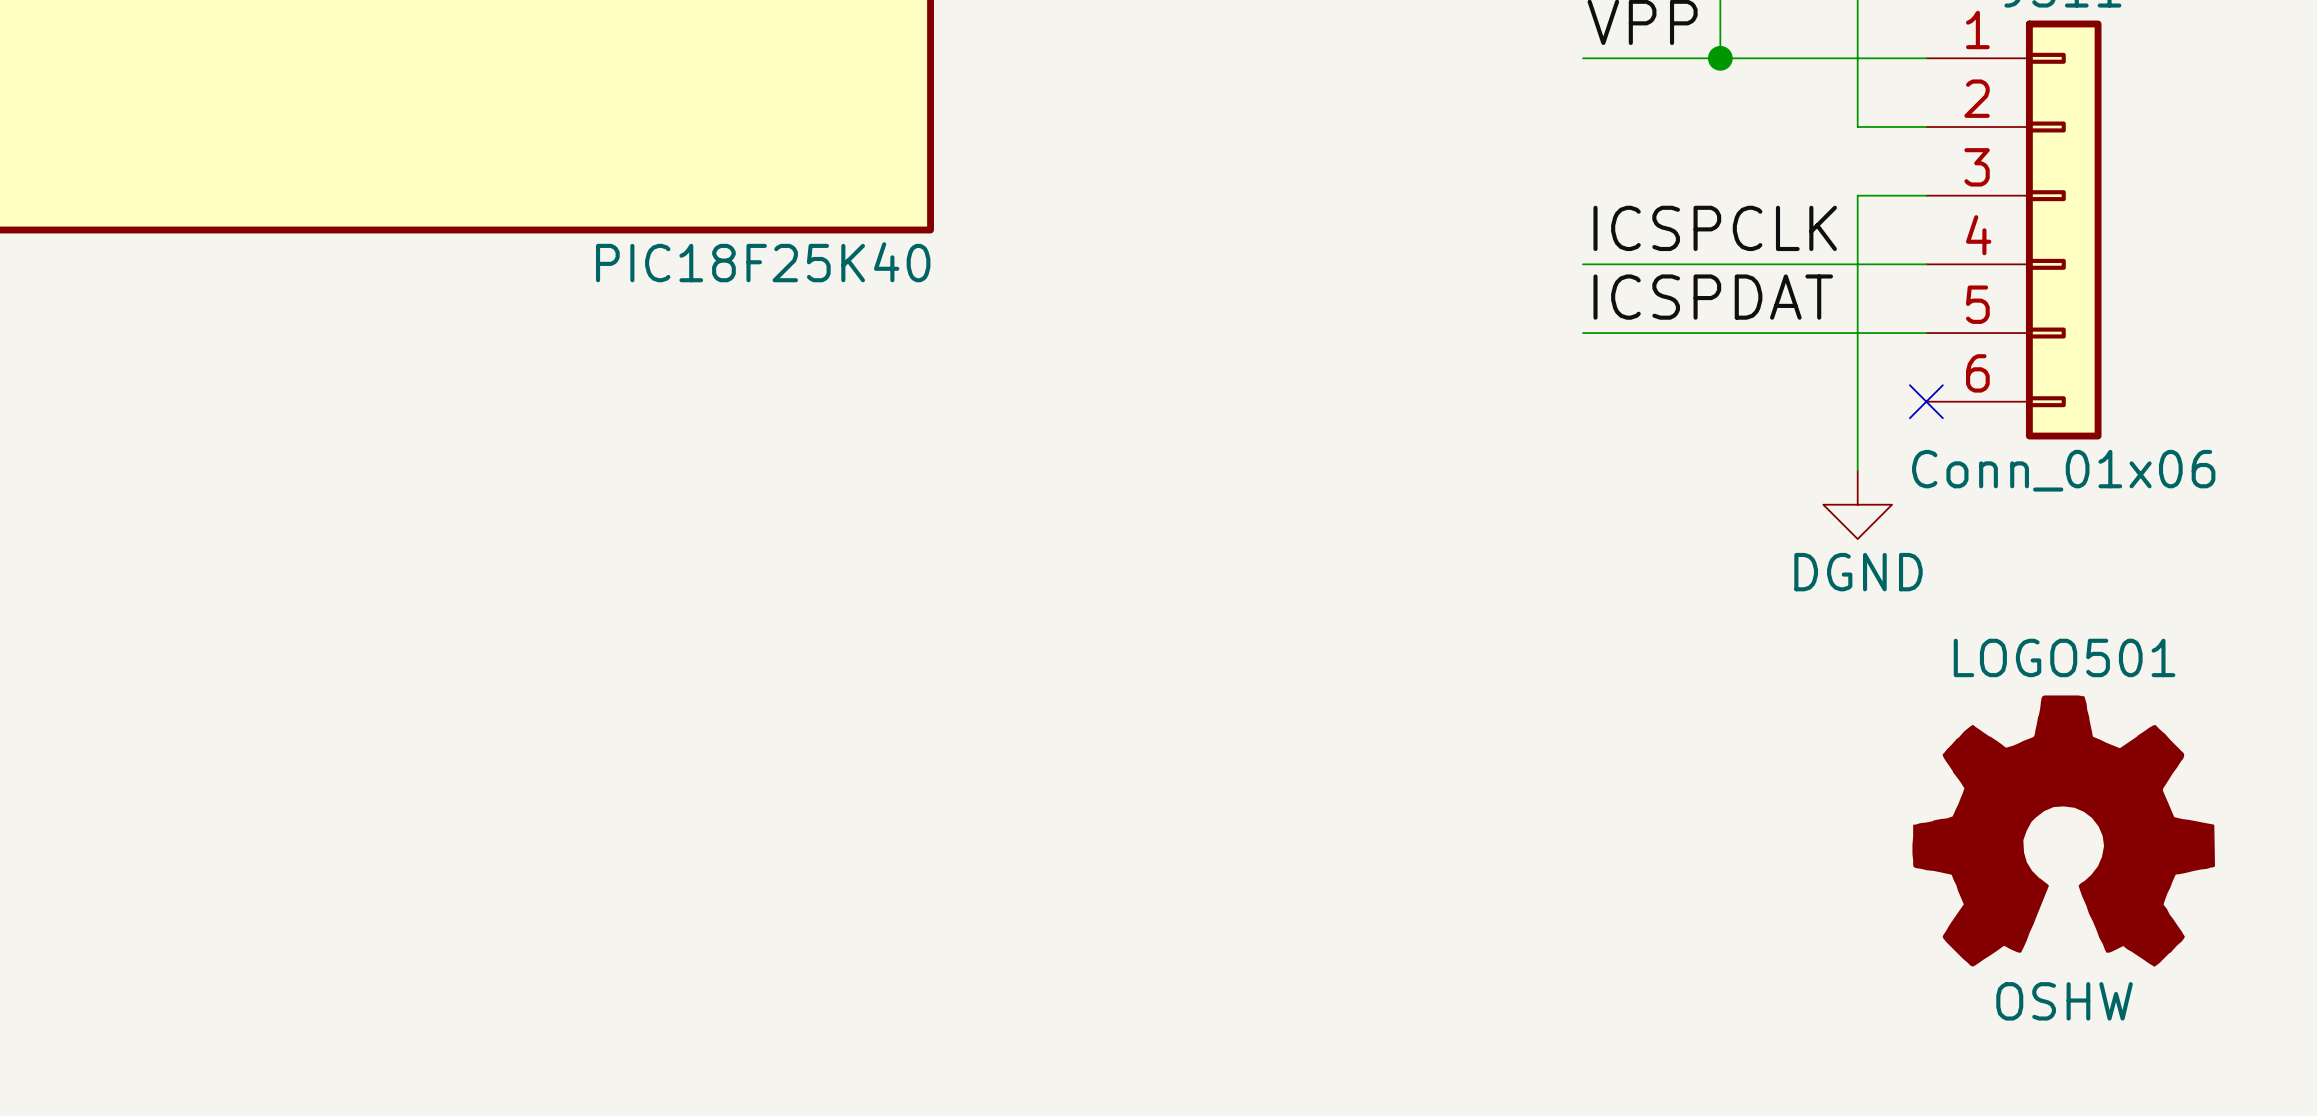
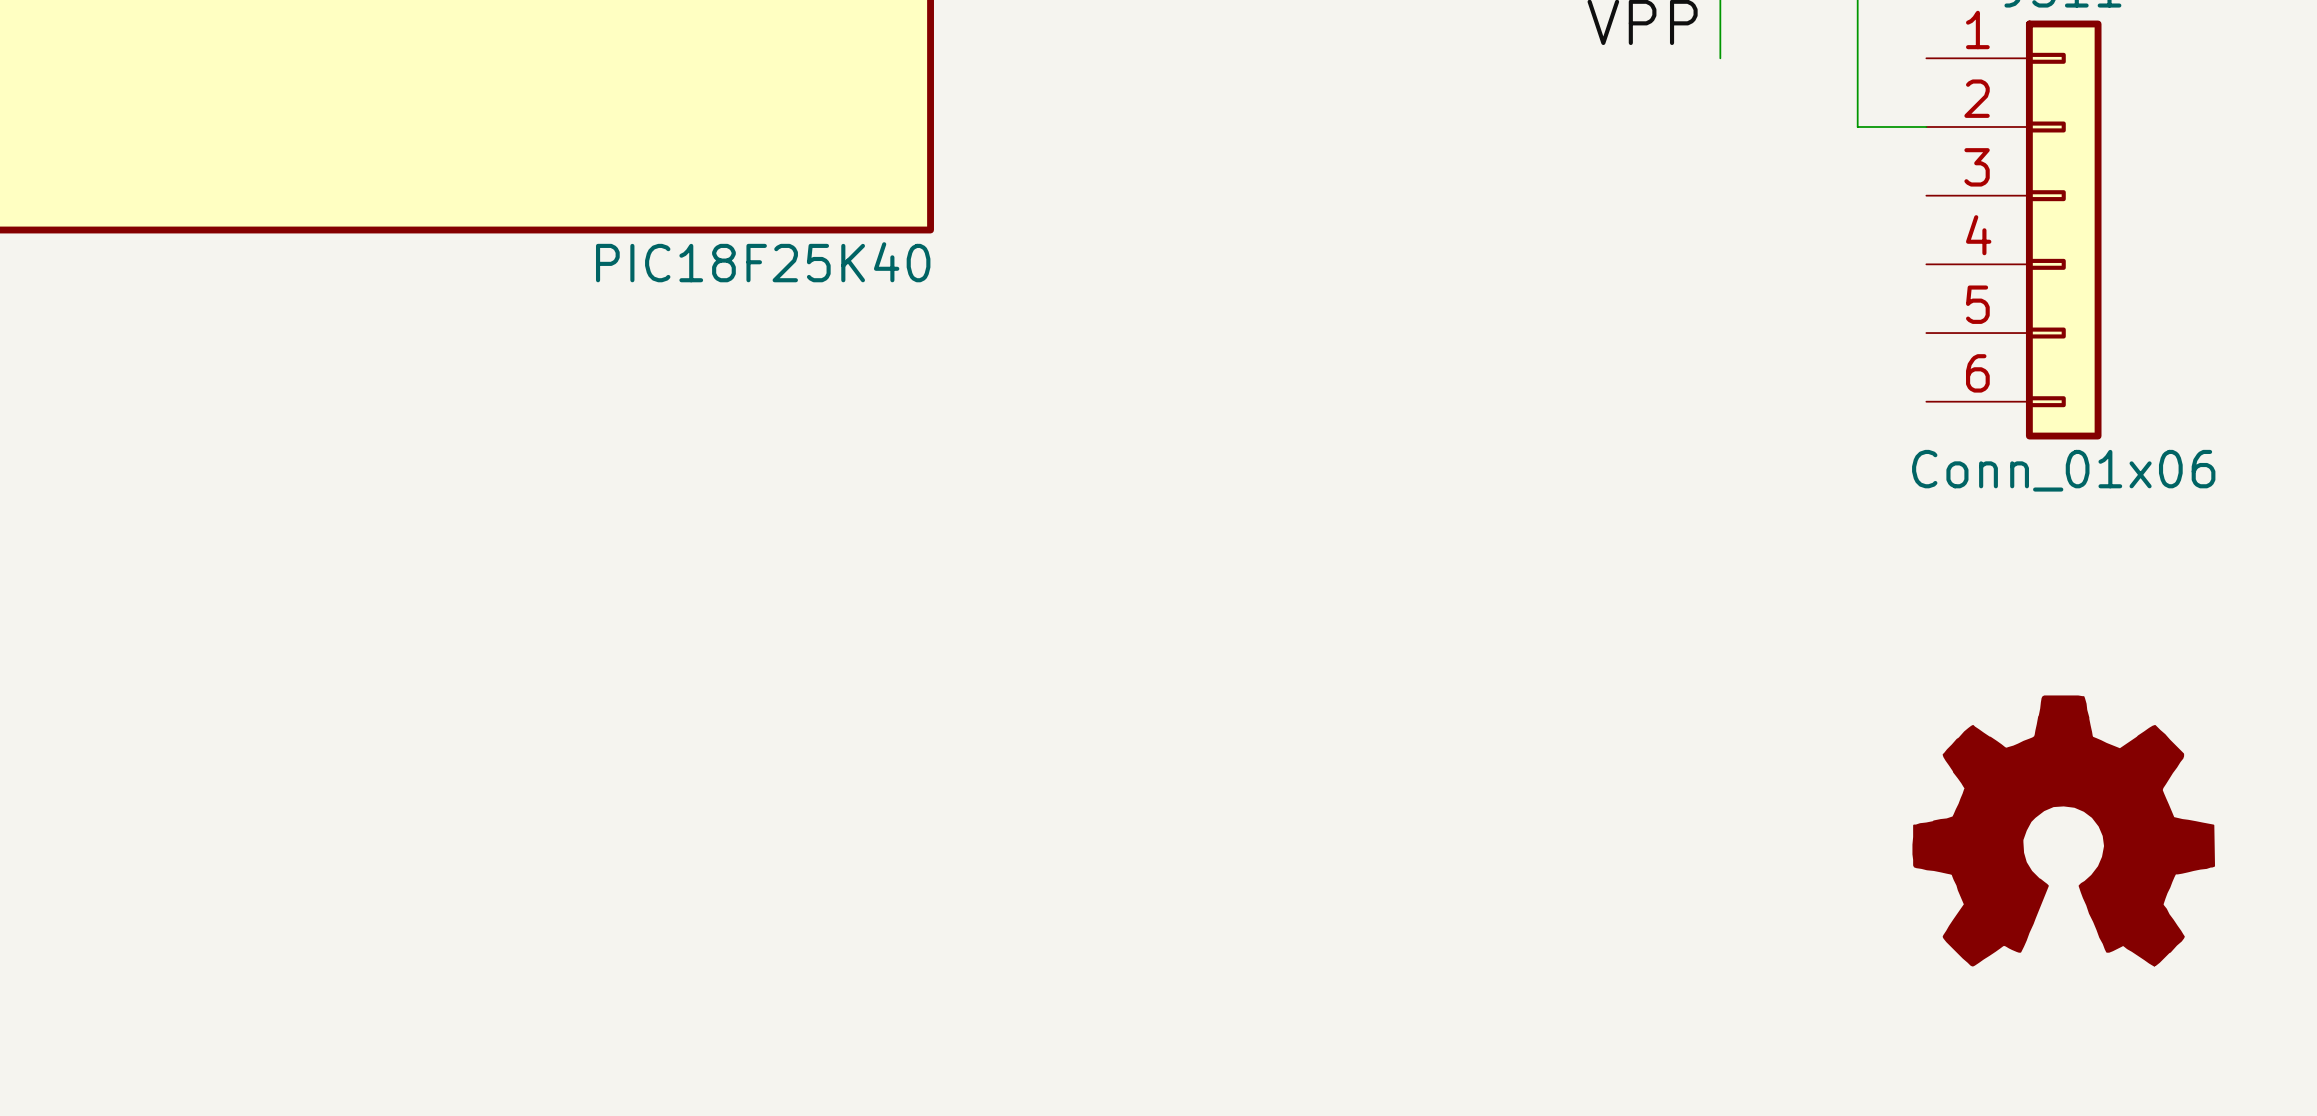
wire: (1582, 58) (1926, 58) -> none
junction: (1720, 58) -> none
wire: (1926, 195) (1857, 195) (1857, 470) -> none
label: ICSPCLK (1715, 228) -> none
wire: (1582, 264) (1926, 264) -> none
label: ICSPDAT (1713, 297) -> none
wire: (1582, 333) (1926, 333) -> none
no-connect mark: (1926, 401) -> none
power symbol: DGND (1857, 504) -> none
LOGO501 name: LOGO501 (2064, 657) -> none
LOGO501 value: OSHW (2064, 1001) -> none

